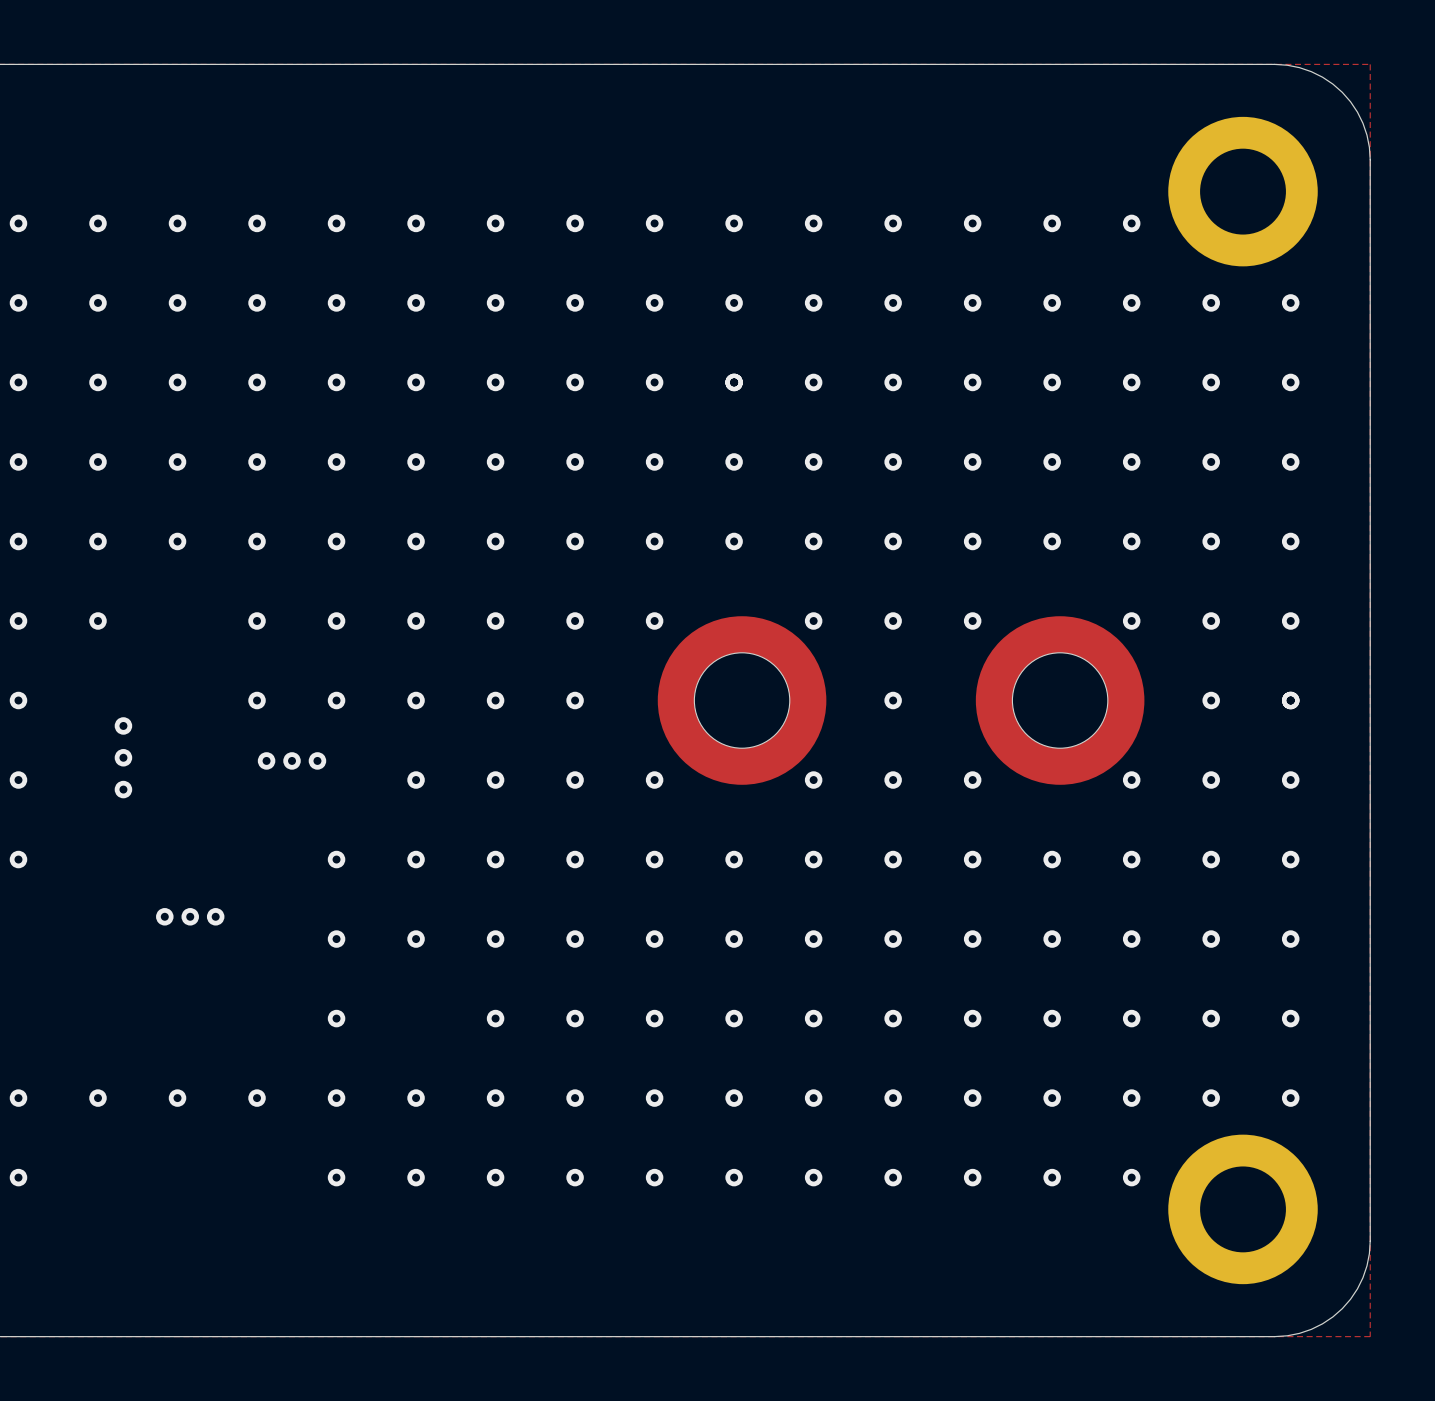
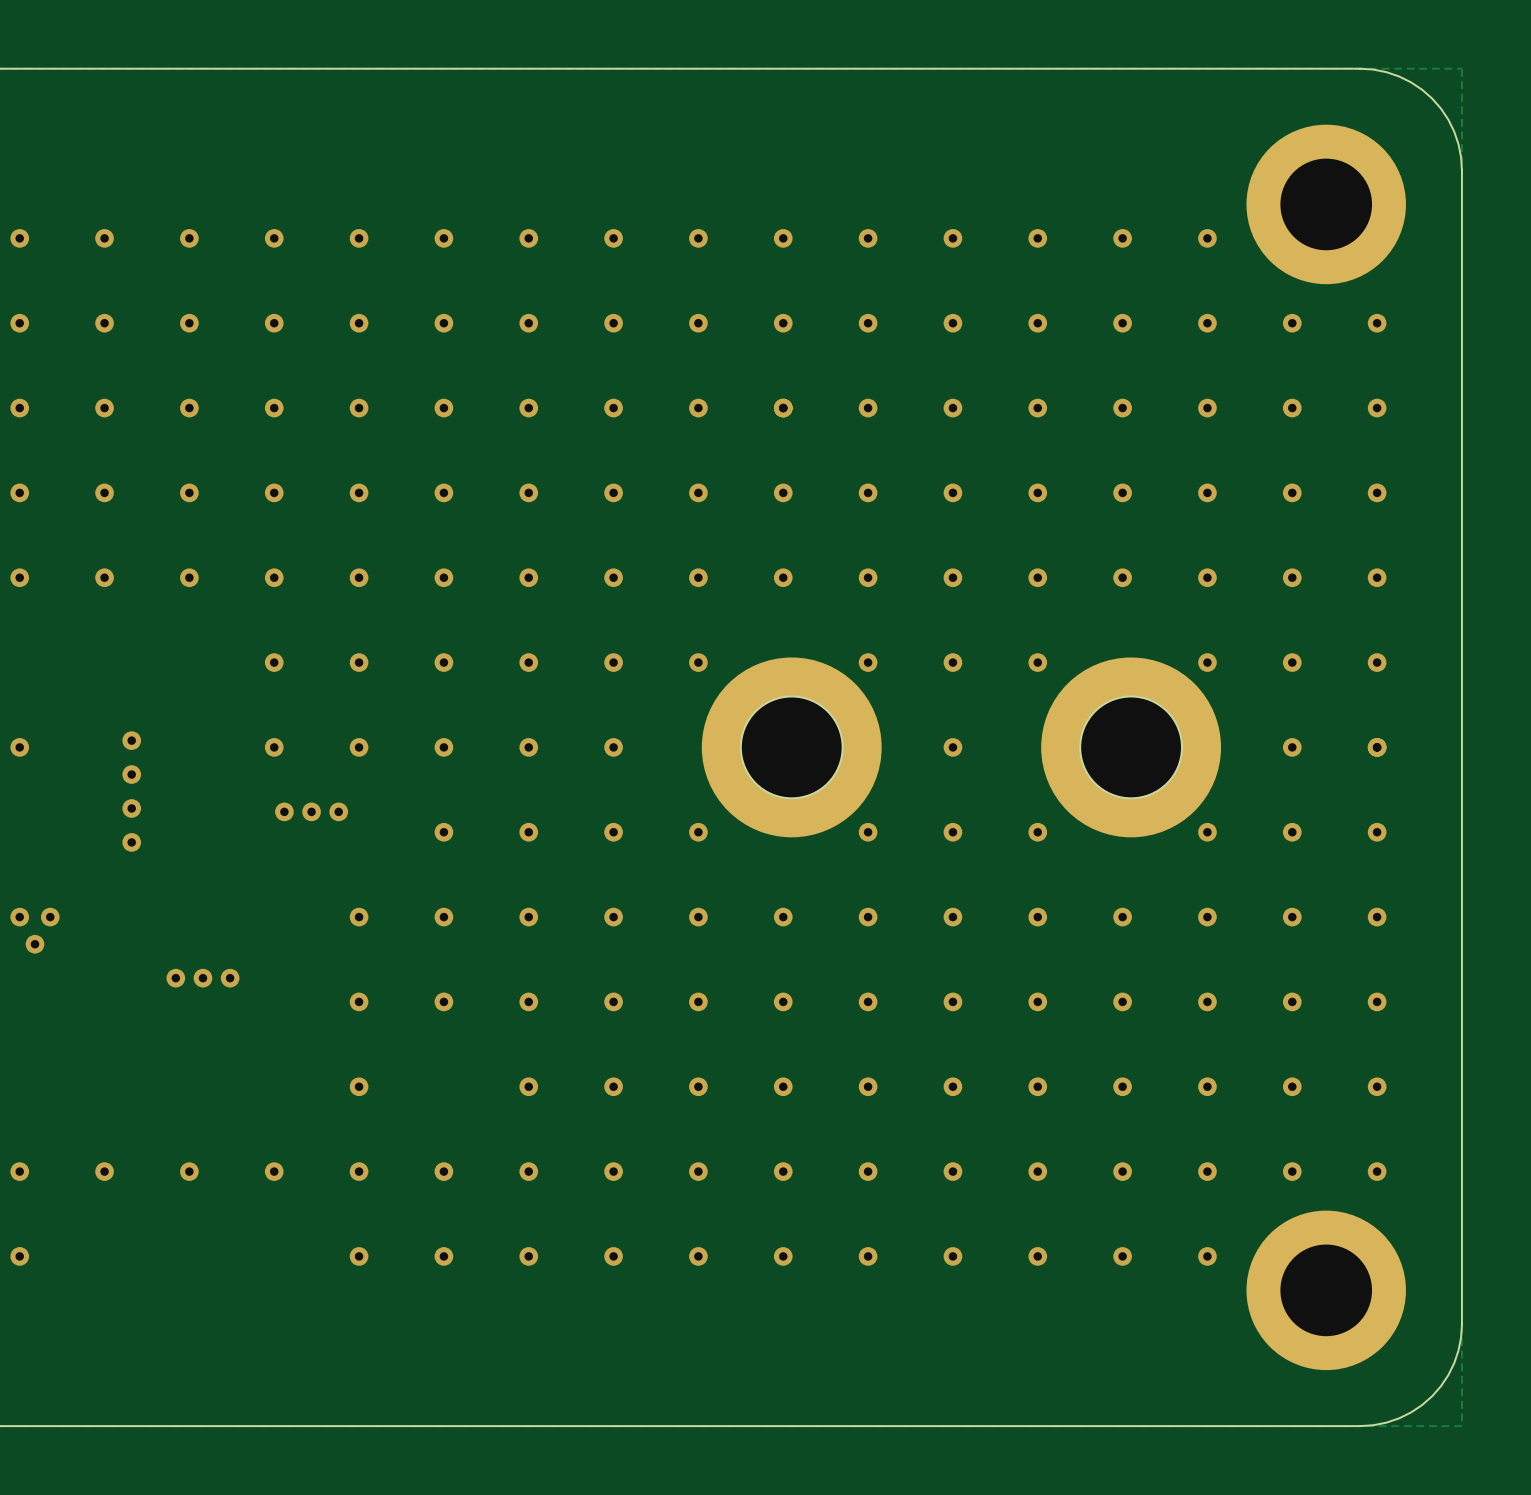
via: (18, 620) -> none
via: (98, 620) -> none
via: none -> (131, 740)
via: (18, 780) -> none
via: none -> (50, 917)
via: none -> (34, 944)

